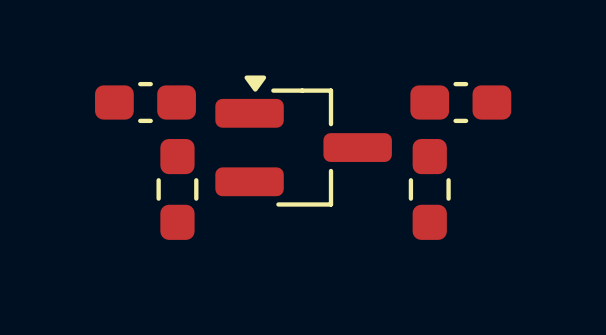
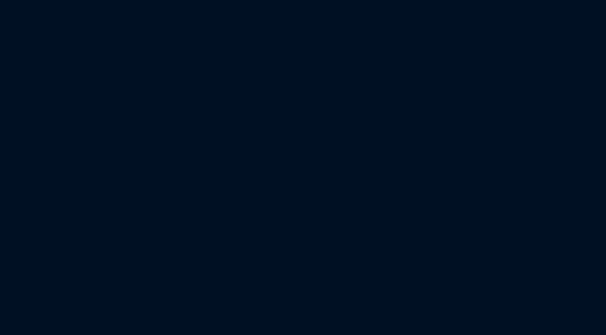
part: (145, 102) -> none
part: (460, 102) -> none
part: (303, 141) -> none
part: (177, 189) -> none
part: (429, 189) -> none

